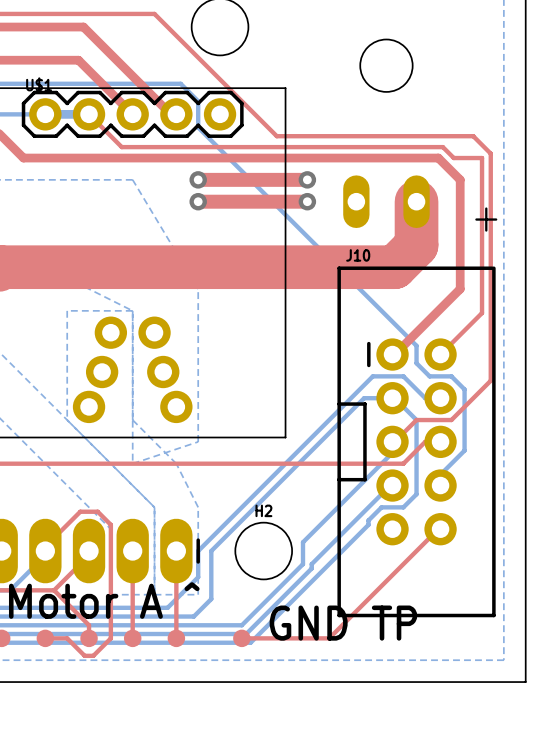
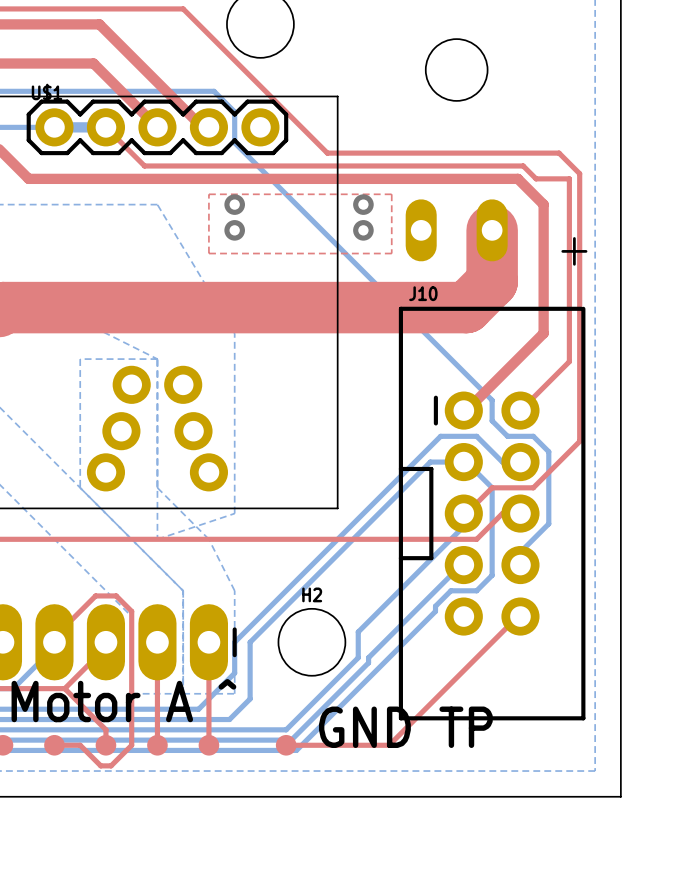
top zone outline: none -> (208, 194) (391, 194) (391, 253) (208, 253) (208, 194)
top track: (198, 179) (307, 179) -> none
top track: (198, 201) (307, 201) -> none

